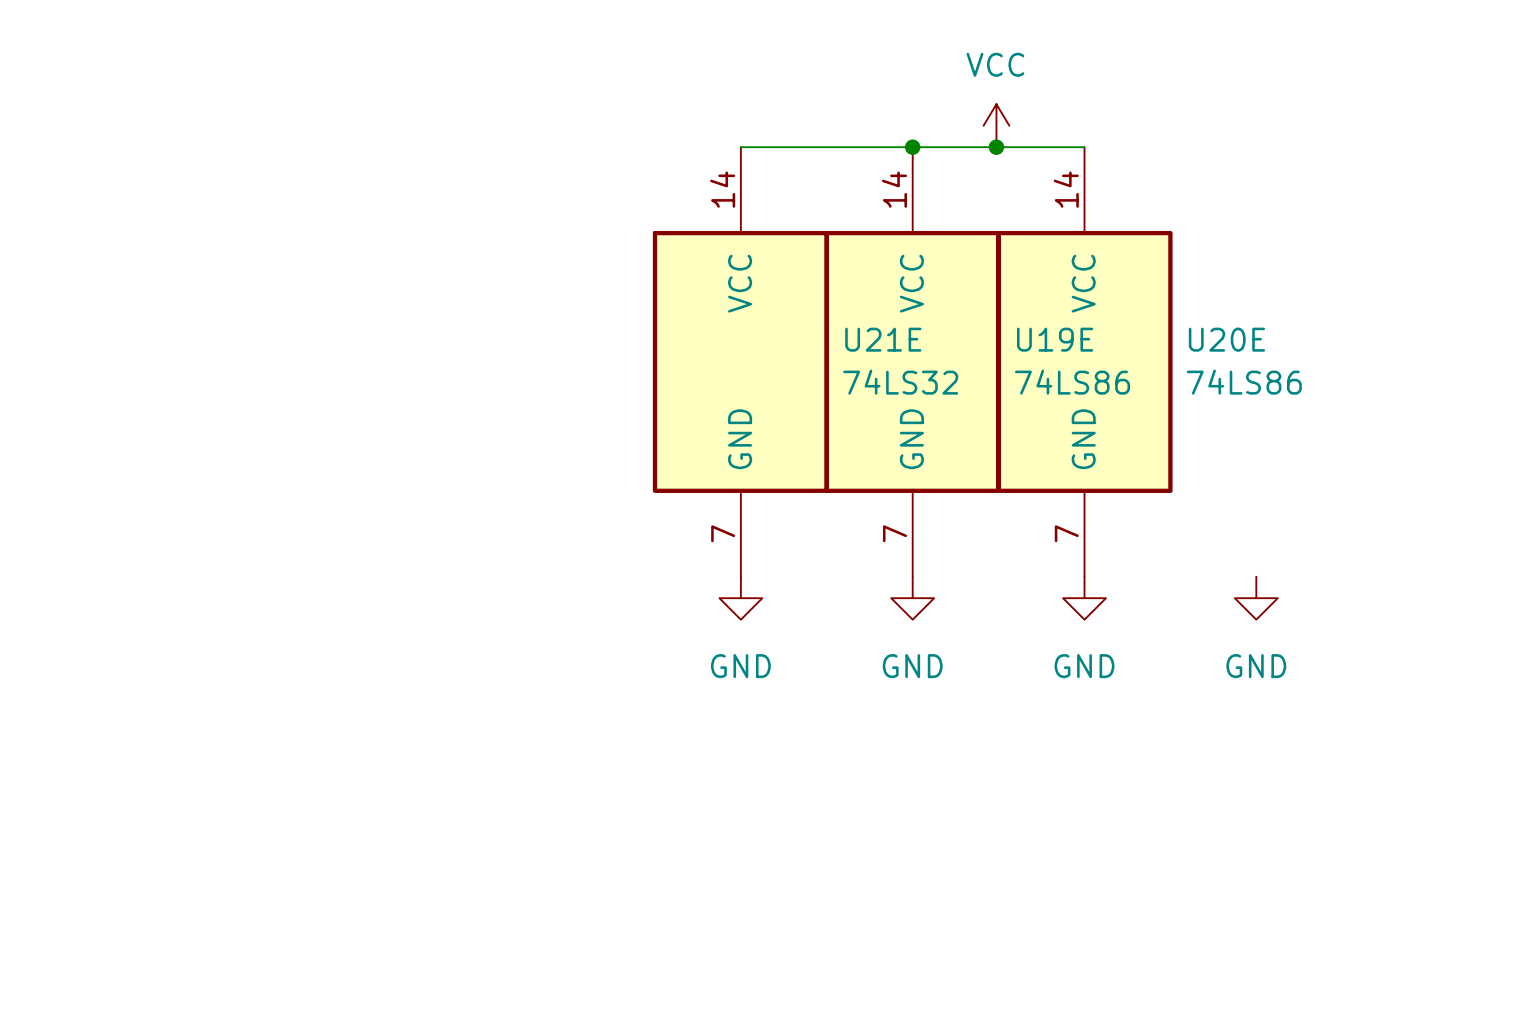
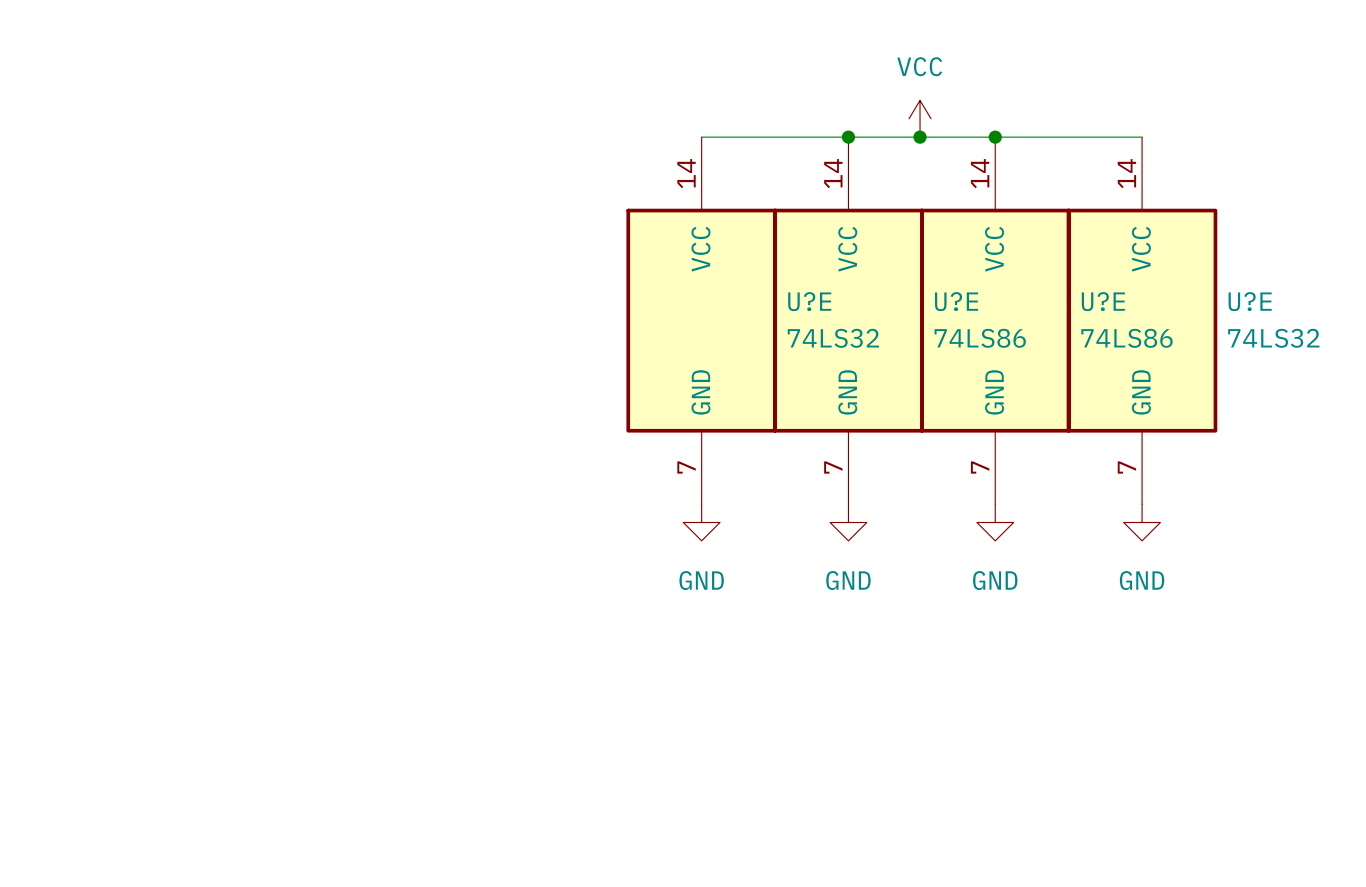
wire: none -> (995, 137) (1142, 137)
junction: none -> (995, 137)
U21E name: U21E (883, 339) -> U?E (809, 301)
U19E name: U19E (1055, 339) -> U?E (956, 301)
U20E name: U20E (1226, 339) -> U?E (1103, 301)
U?E: none -> 74LS32 (1142, 320)

